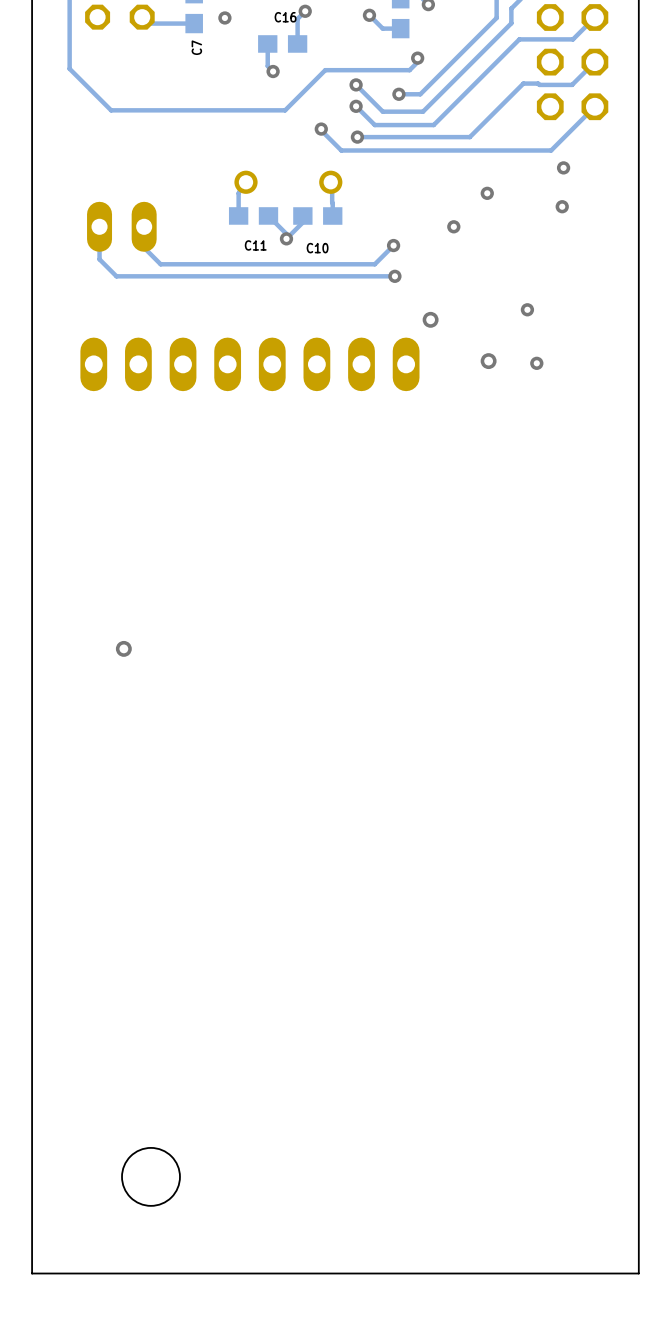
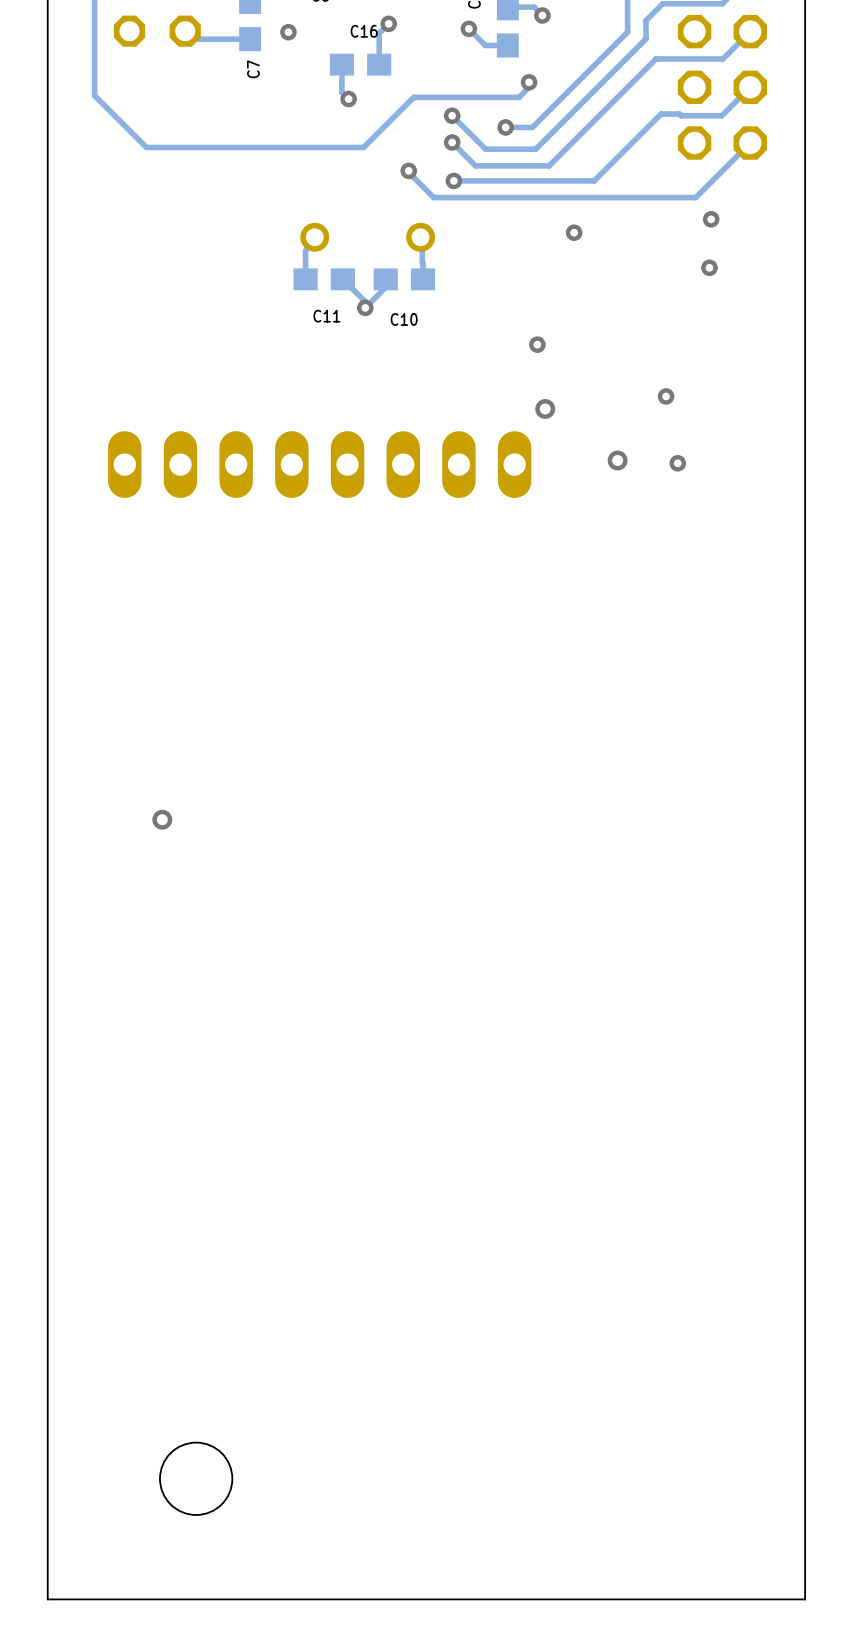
via: none -> (574, 232)
via: (487, 193) -> none
track: (99, 226) (99, 259) (116, 276) (394, 276) -> none
part: (121, 226) -> none
track: (144, 226) (144, 247) (160, 264) (374, 264) (393, 245) -> none
via: (453, 226) -> none
via: (393, 245) -> none
via: none -> (537, 344)
via: (394, 276) -> none

